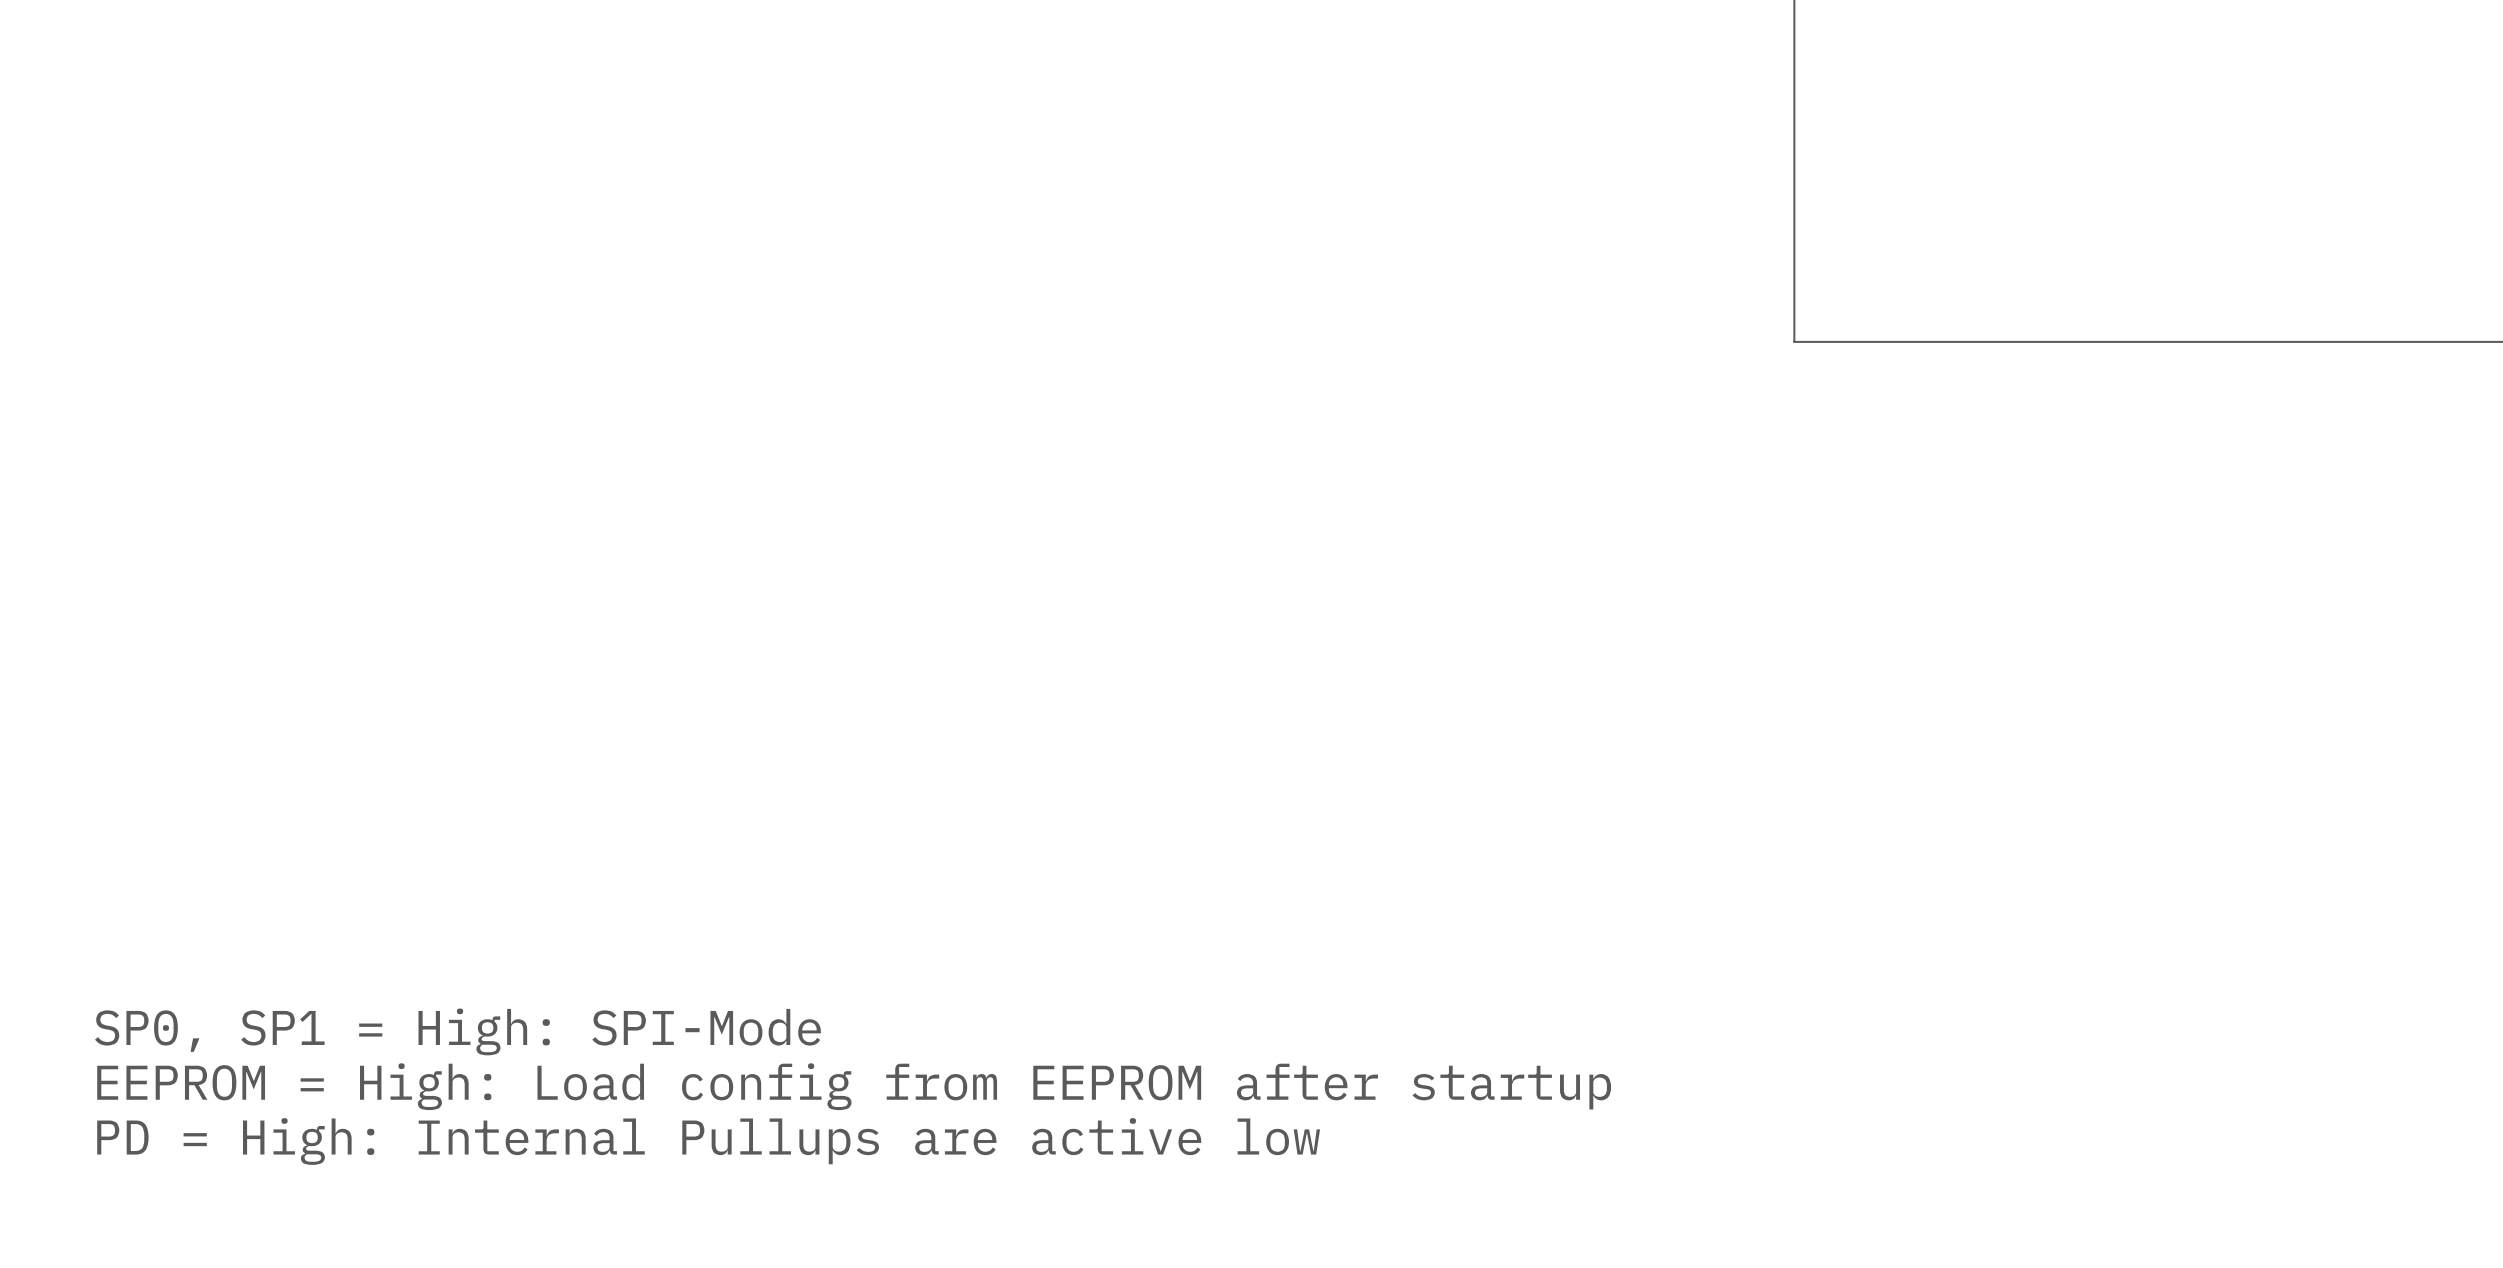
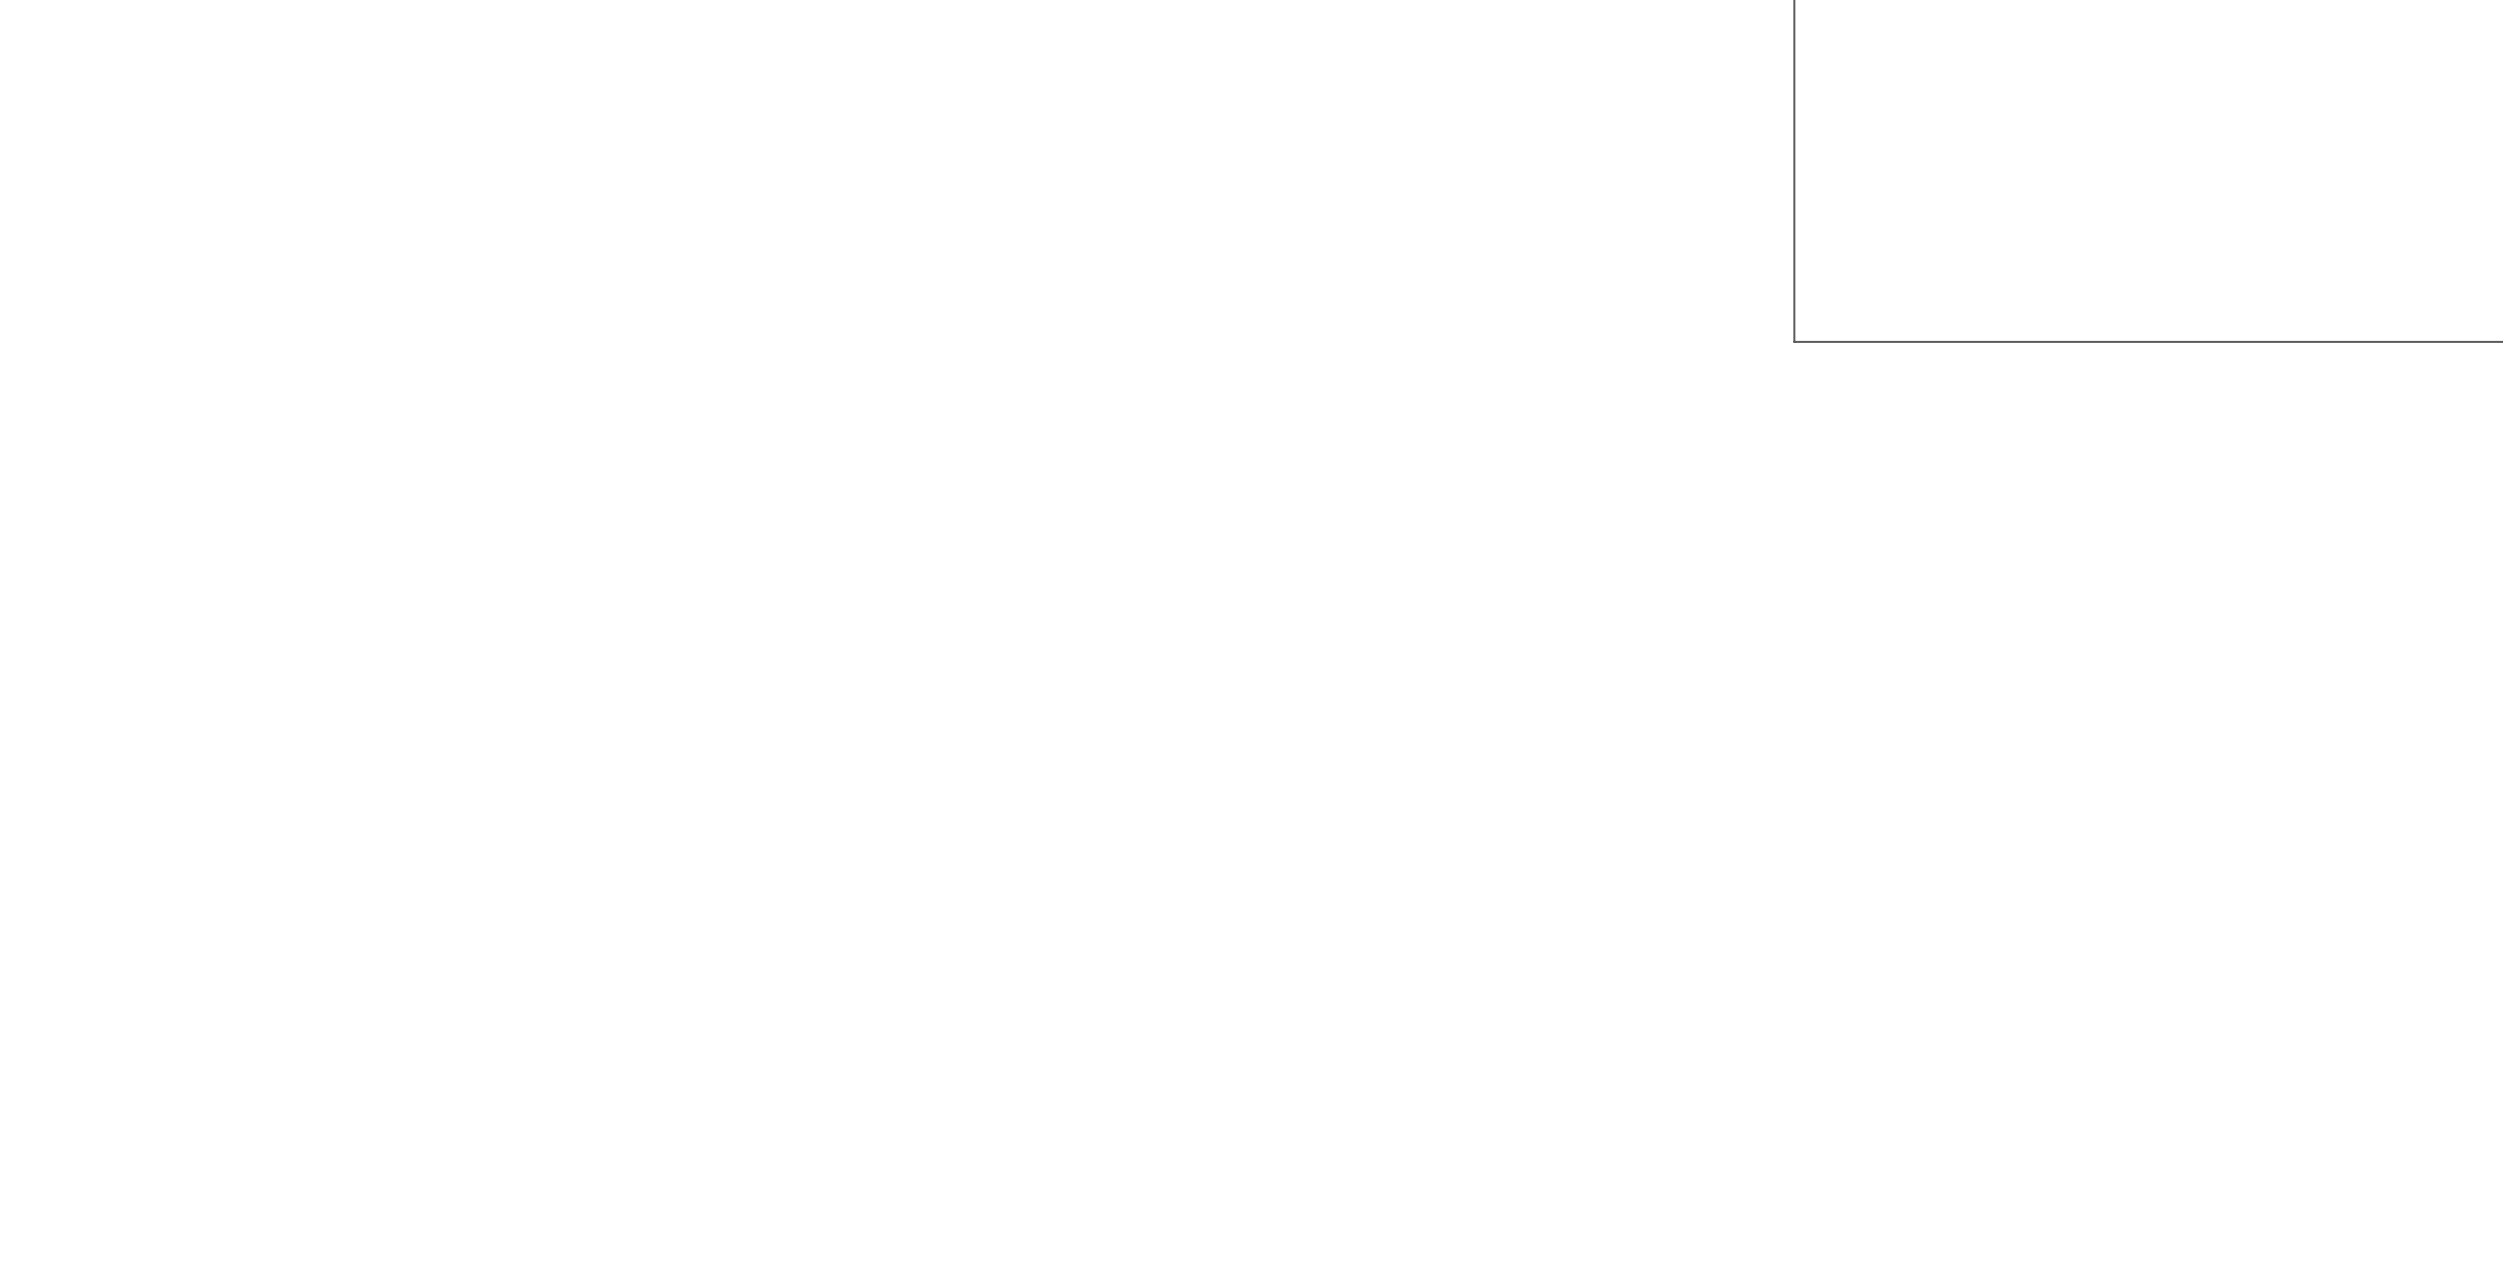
text: SP0, SP1 = High: SPI-Mode (457, 1031) -> none
text: EEPROM = High: Load config from EEPROM after startup (854, 1086) -> none
text: PD = High: Internal Pullups are active low (708, 1141) -> none

